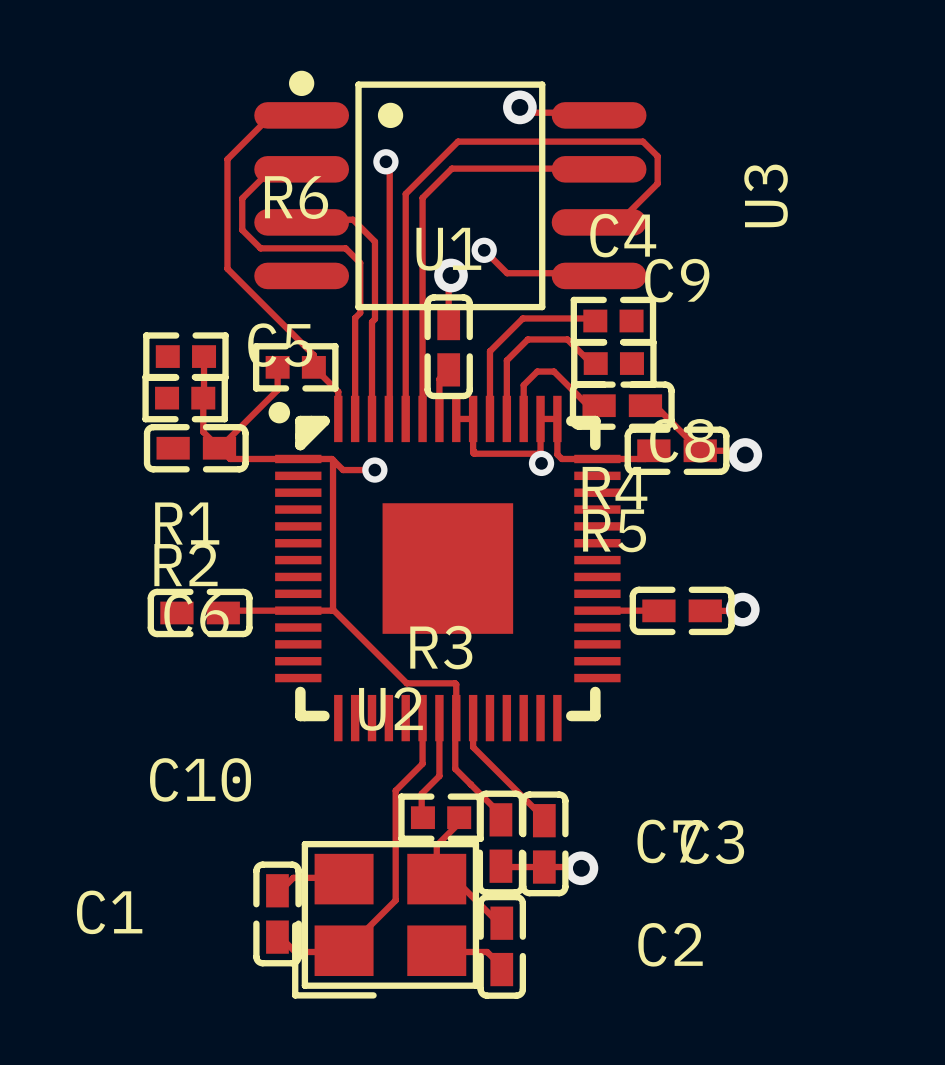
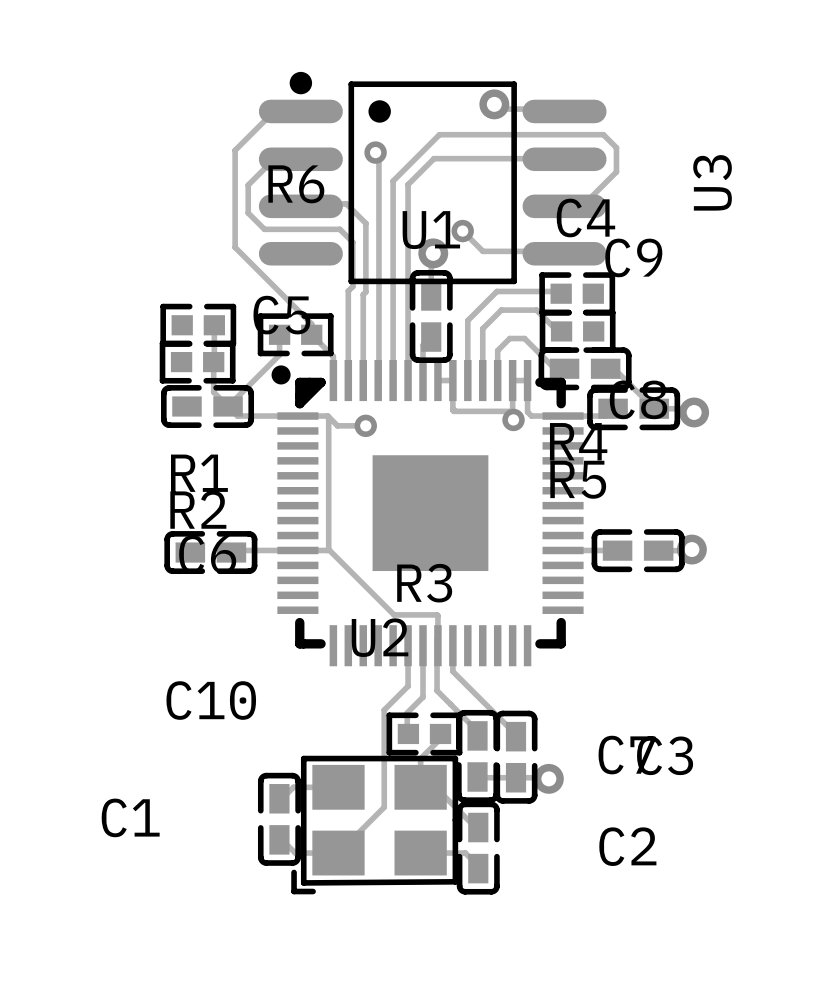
U2 footprint: [292, 840, 480, 999] -> [291, 755, 459, 895]

